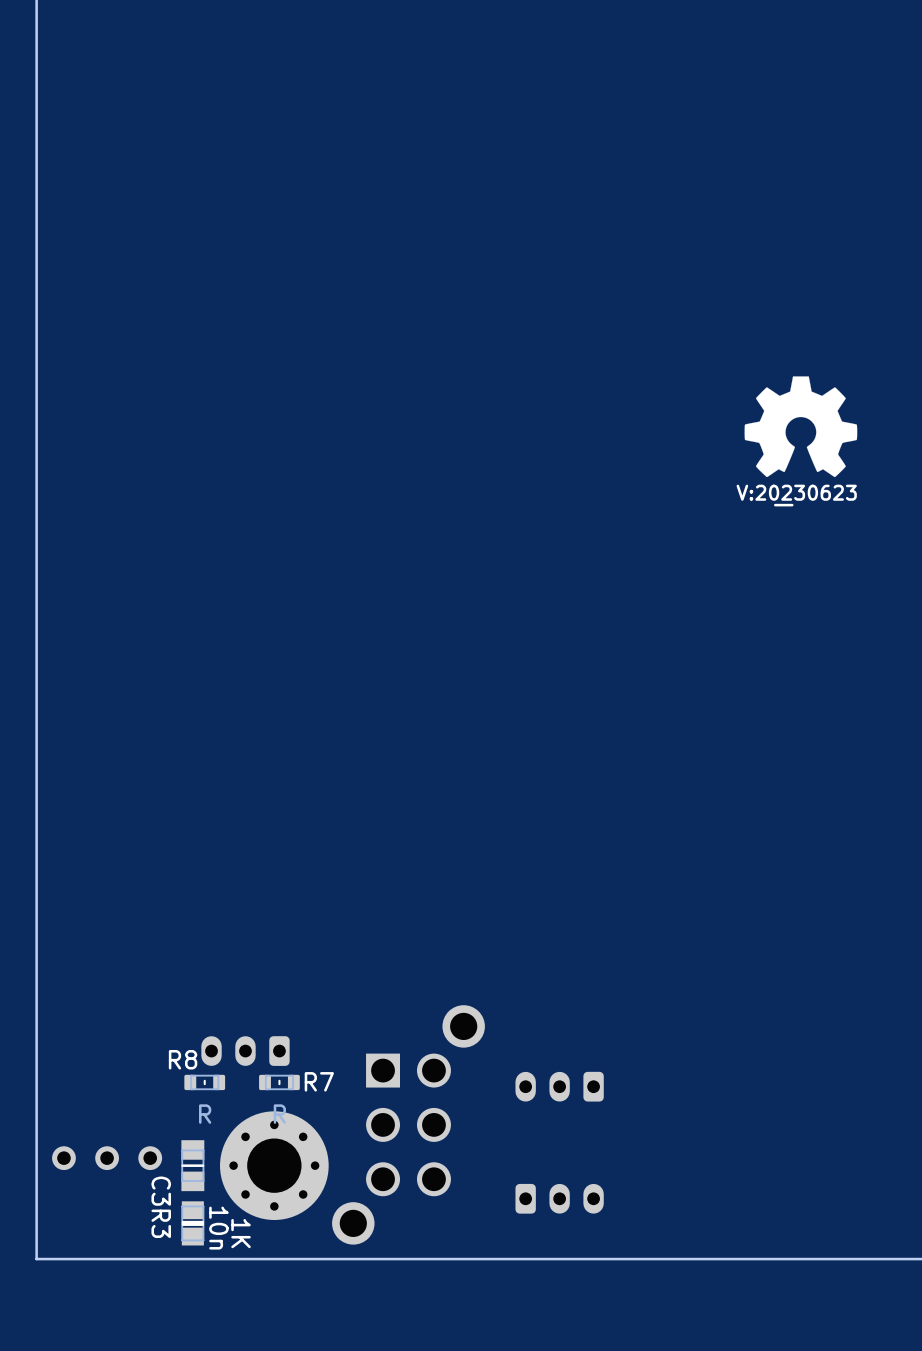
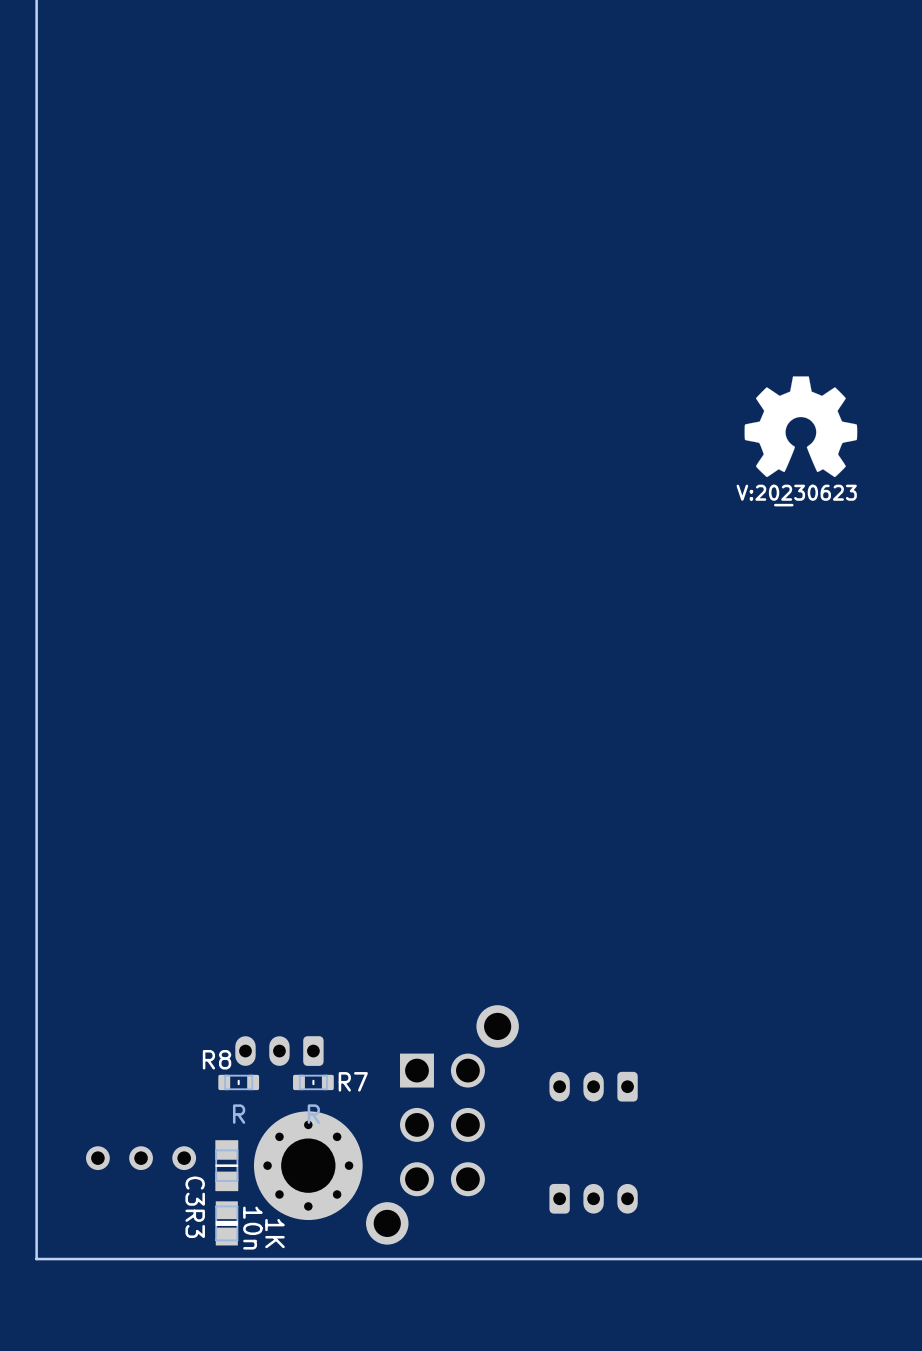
part position: (245, 1051) -> (279, 1051)
R8 position: (204, 1082) -> (238, 1082)
R7 position: (279, 1082) -> (313, 1082)
part position: (559, 1086) -> (593, 1086)
part position: (408, 1124) -> (442, 1124)
part position: (107, 1158) -> (141, 1158)
C3 position: (192, 1165) -> (226, 1165)
part position: (274, 1165) -> (308, 1165)
part position: (559, 1198) -> (593, 1198)
R3 position: (192, 1223) -> (226, 1223)

